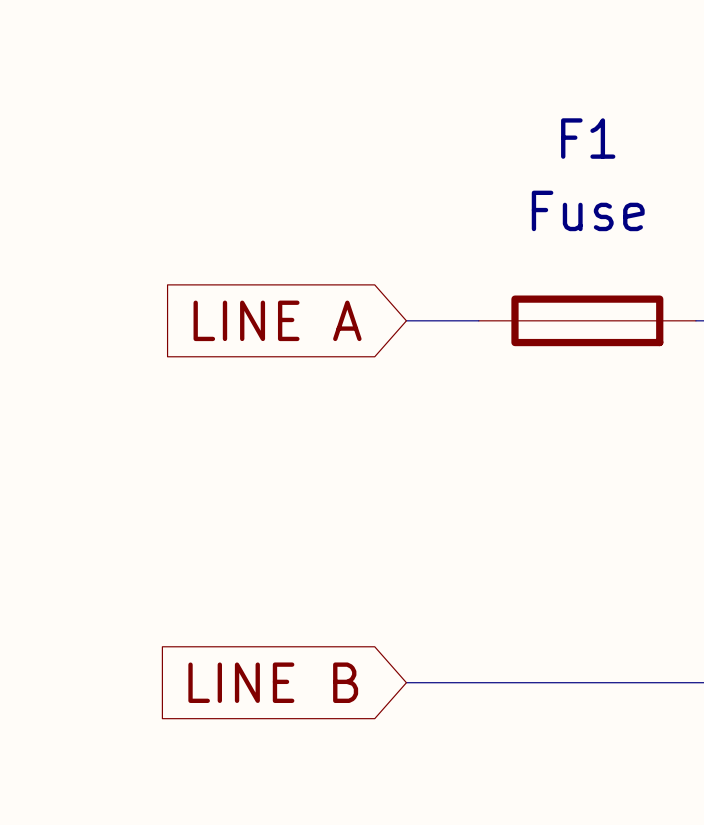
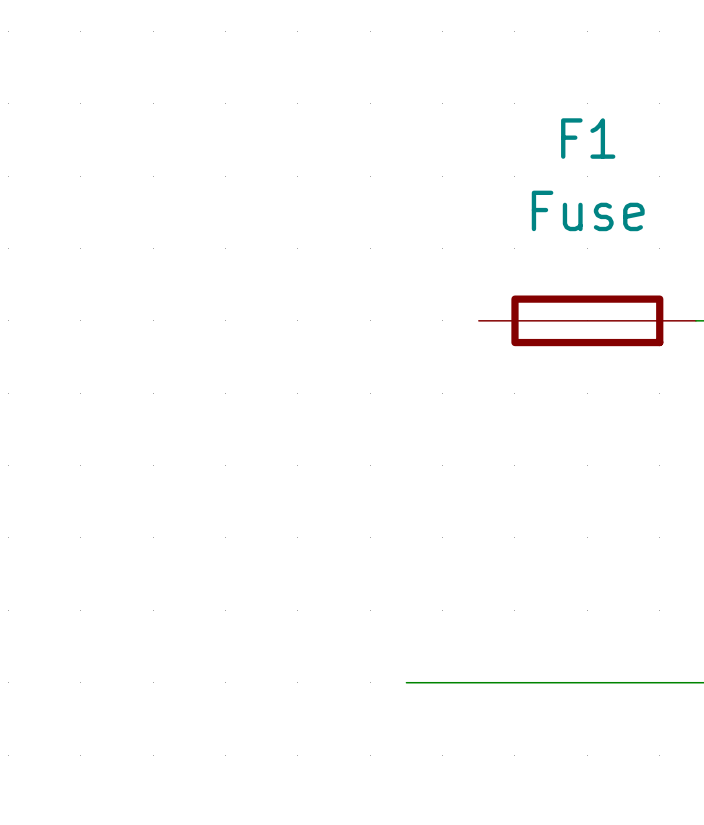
global label: LINE A (277, 320) -> none
wire: (406, 320) (478, 320) -> none
global label: LINE B (273, 682) -> none

